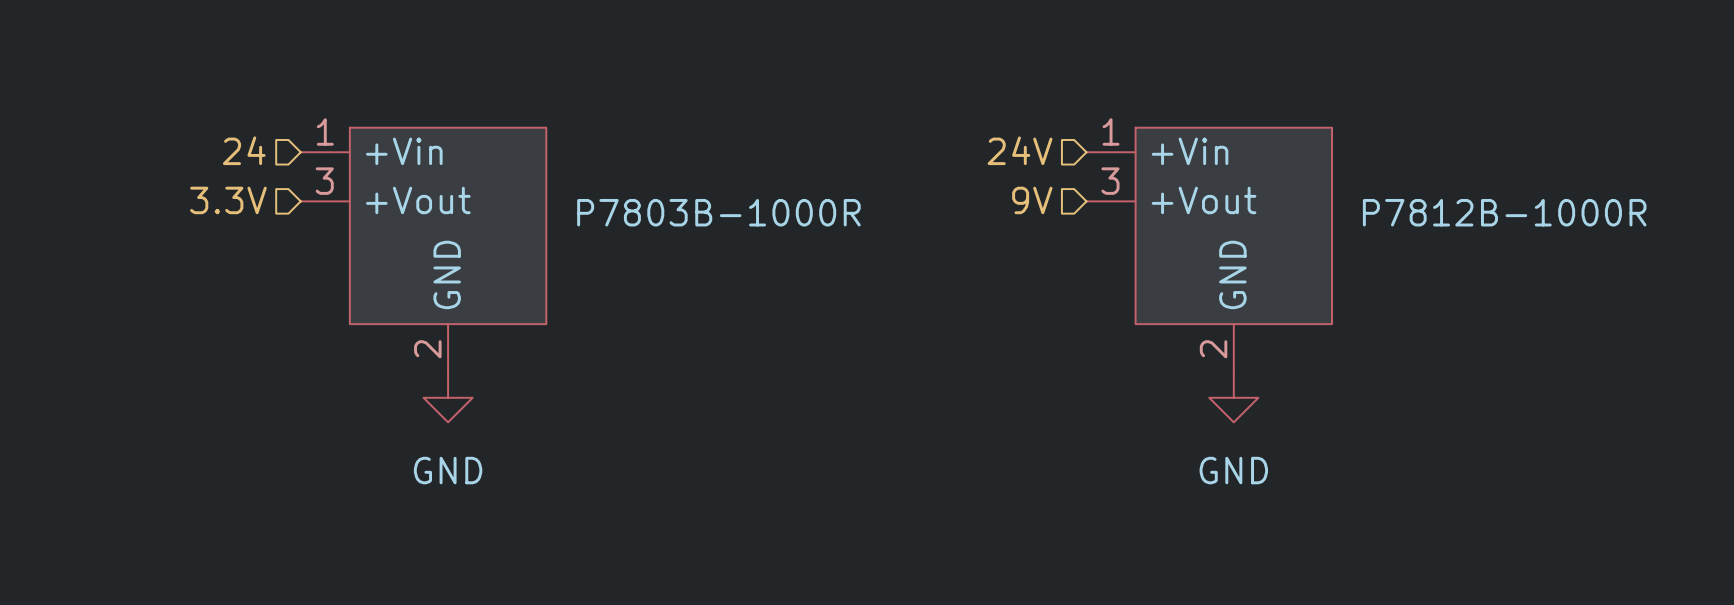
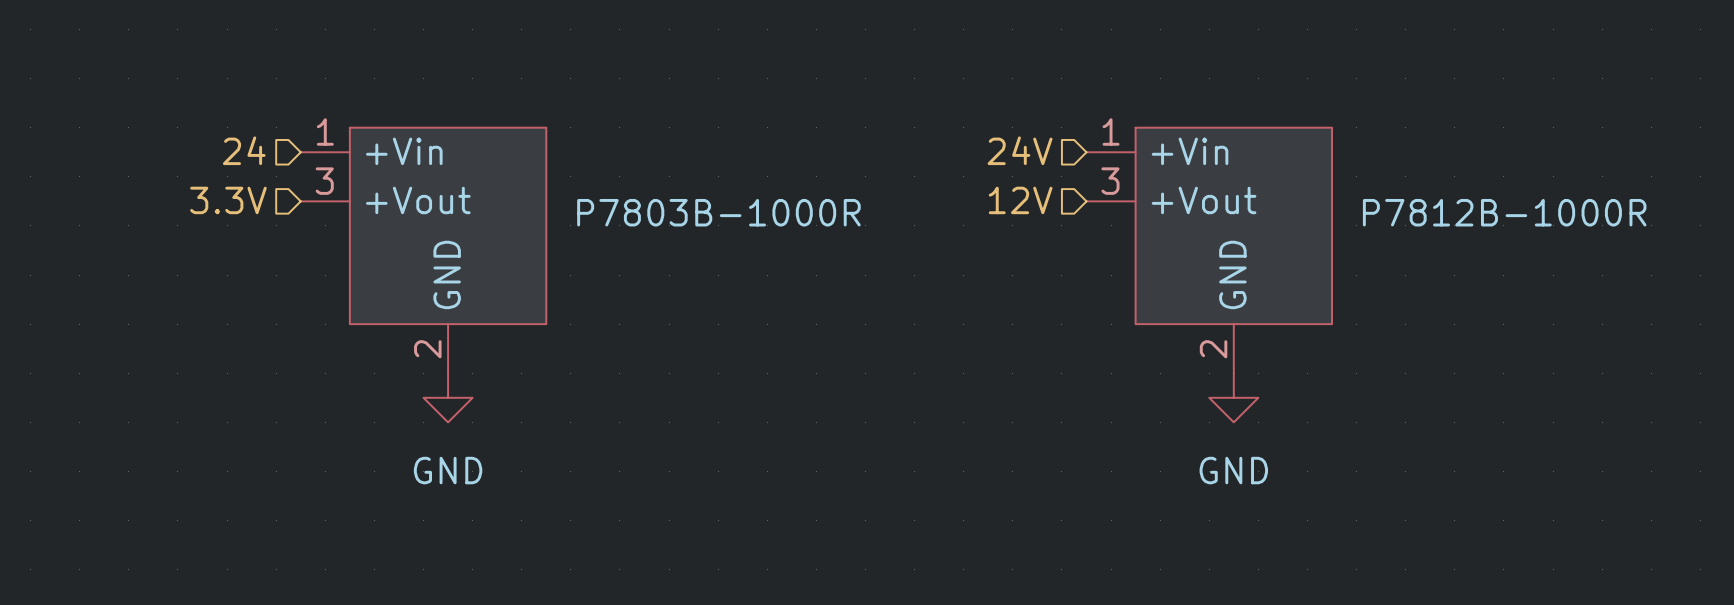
hierarchical label: 9V (1032, 200) -> 12V (1020, 200)

